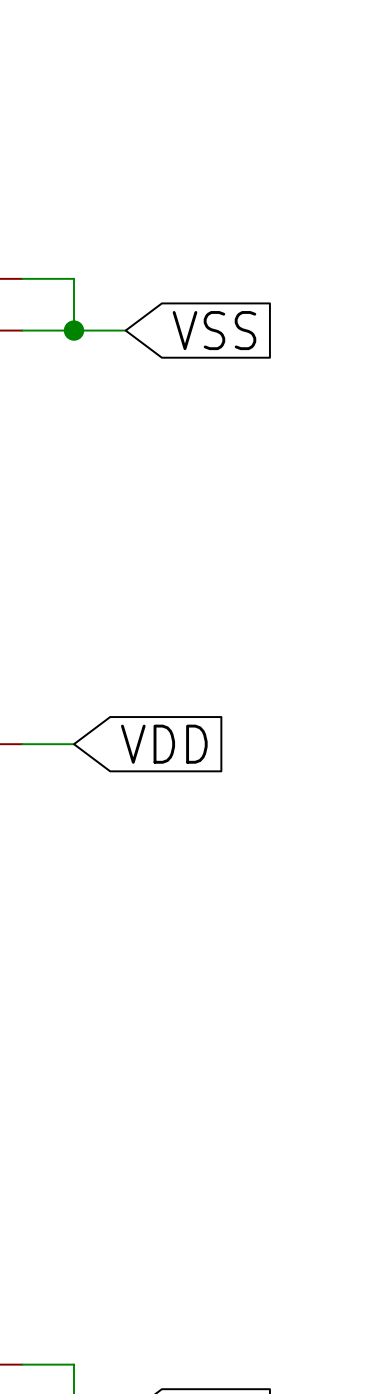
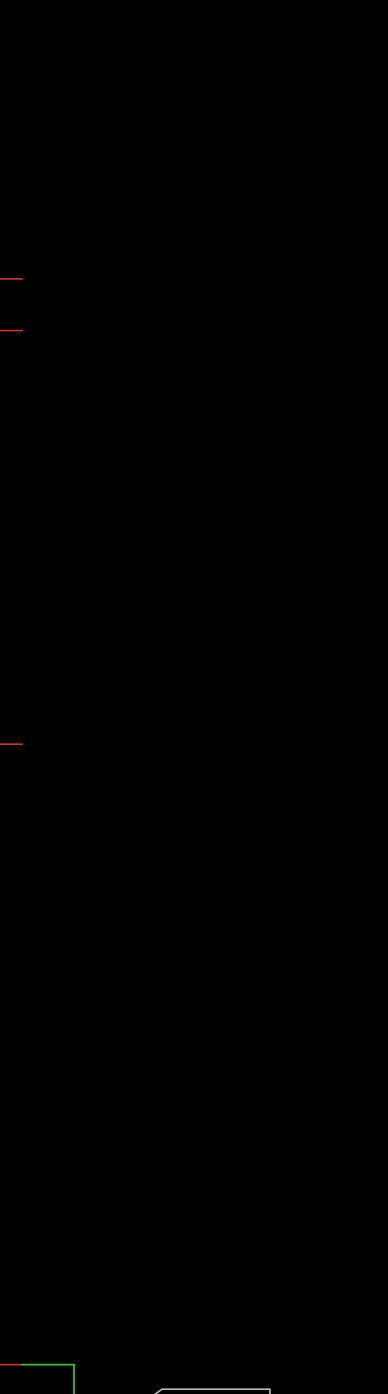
wire: (22, 278) (74, 278) (74, 330) -> none
wire: (22, 330) (125, 330) -> none
junction: (74, 330) -> none
global label: VSS (214, 330) -> none
wire: (22, 744) (74, 744) -> none
global label: VDD (164, 744) -> none

